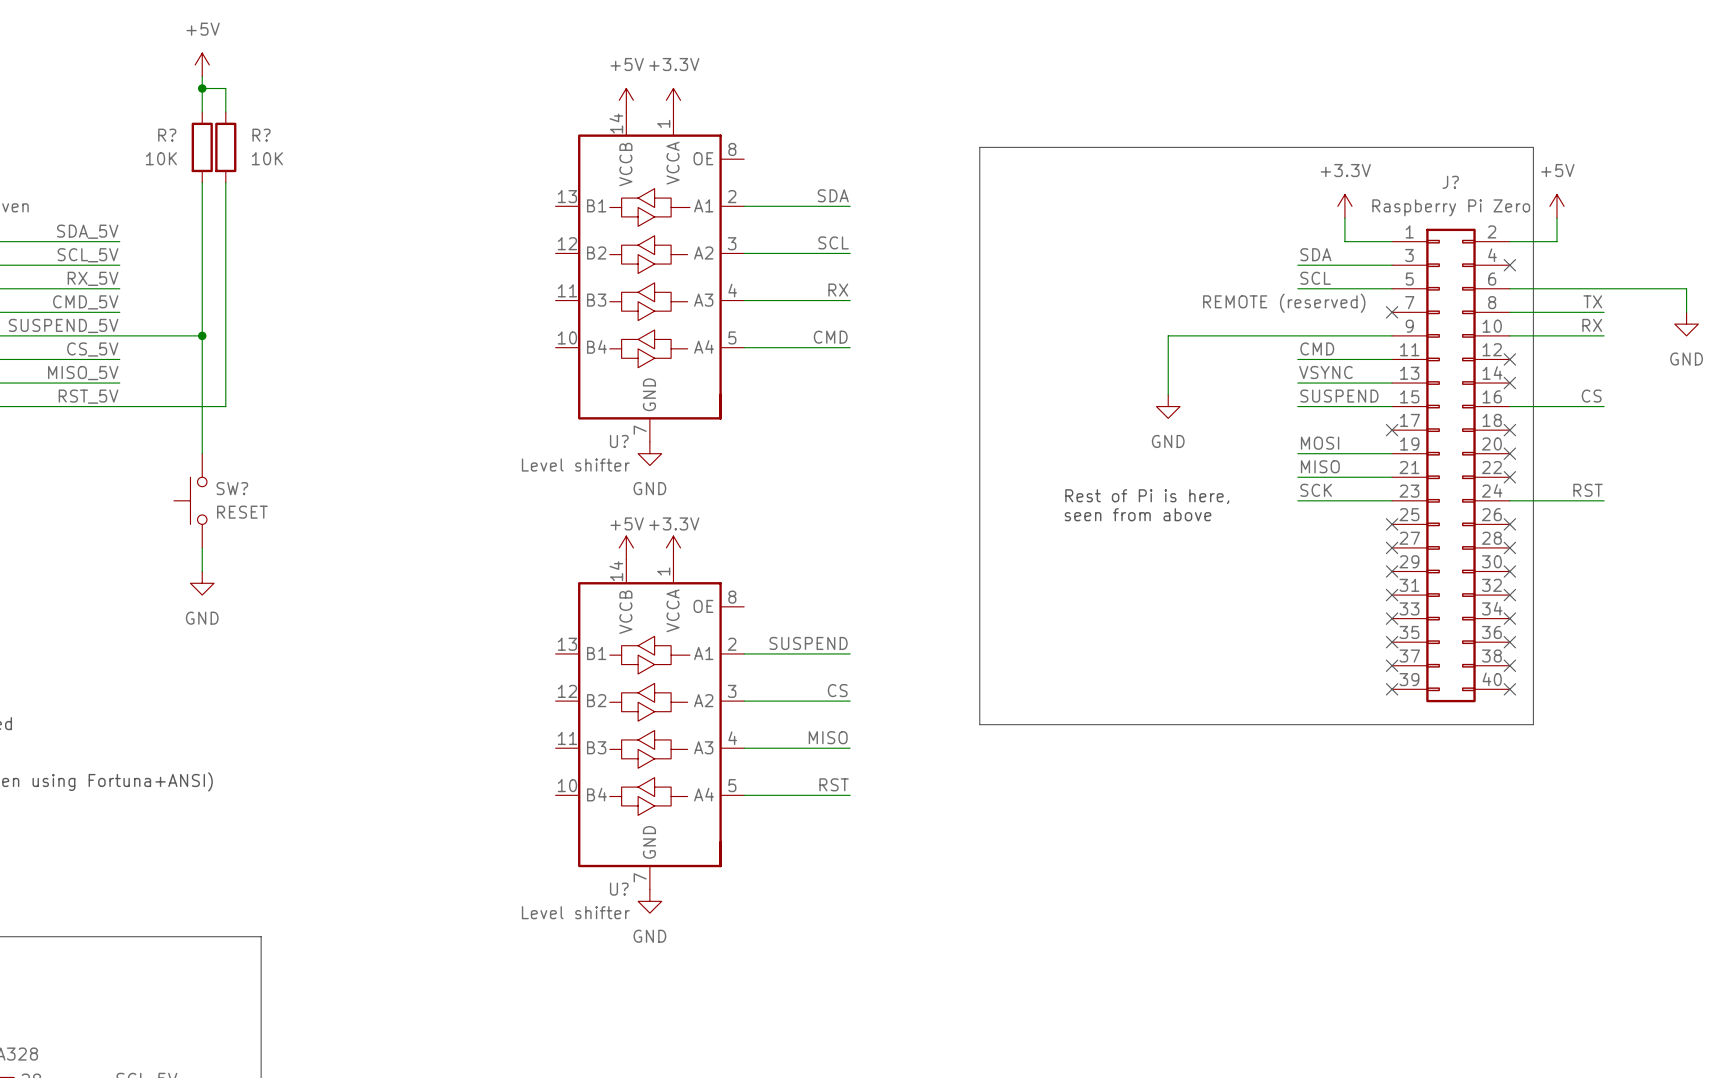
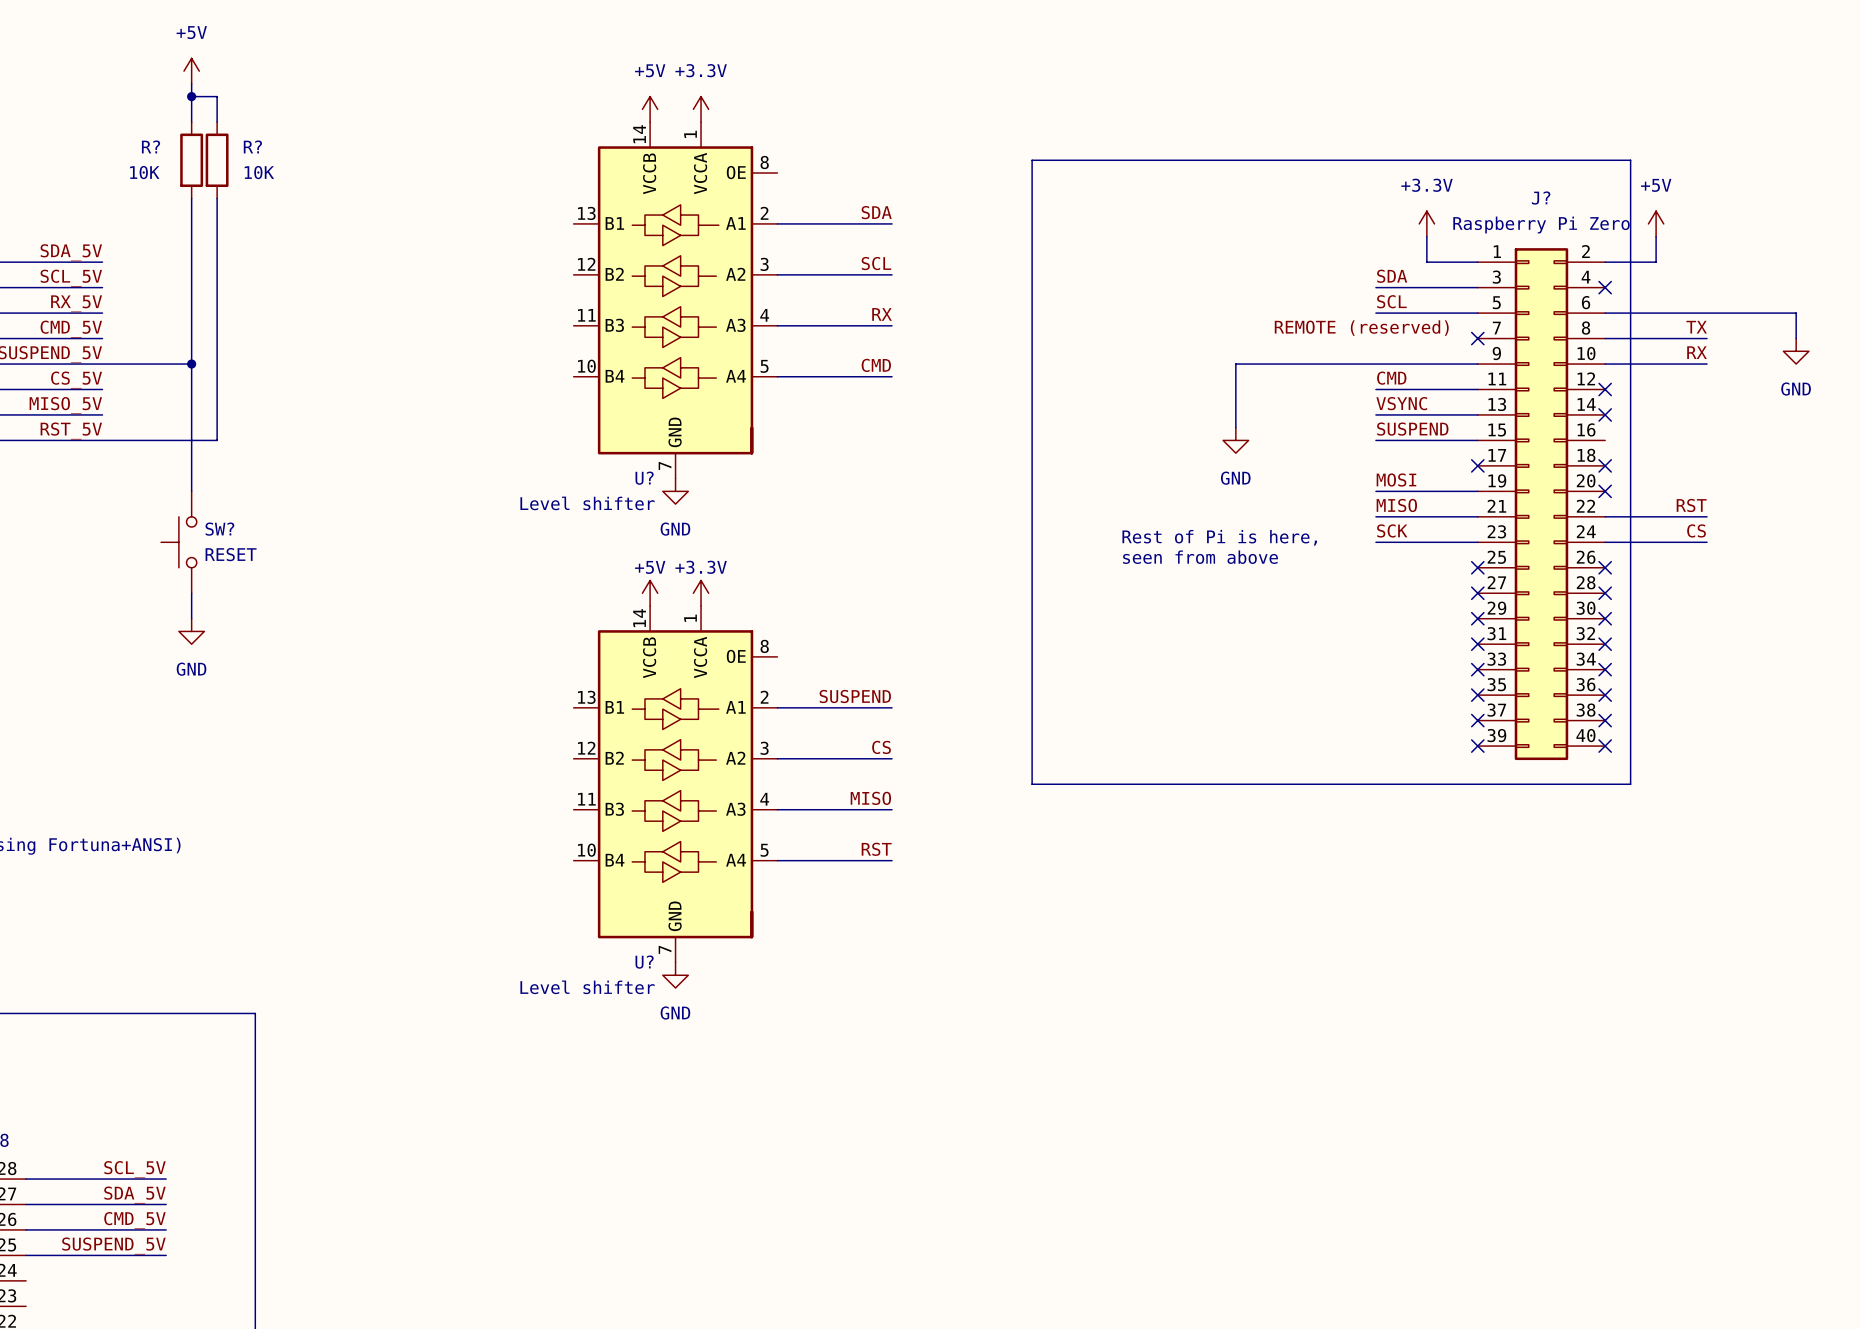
label: CS (1591, 396) -> none
wire: (1509, 406) (1604, 406) -> (1605, 516) (1707, 516)
label: none -> RST (1691, 505)
no-connect mark: (1509, 477) -> none
label: RST (1588, 490) -> CS (1696, 530)

